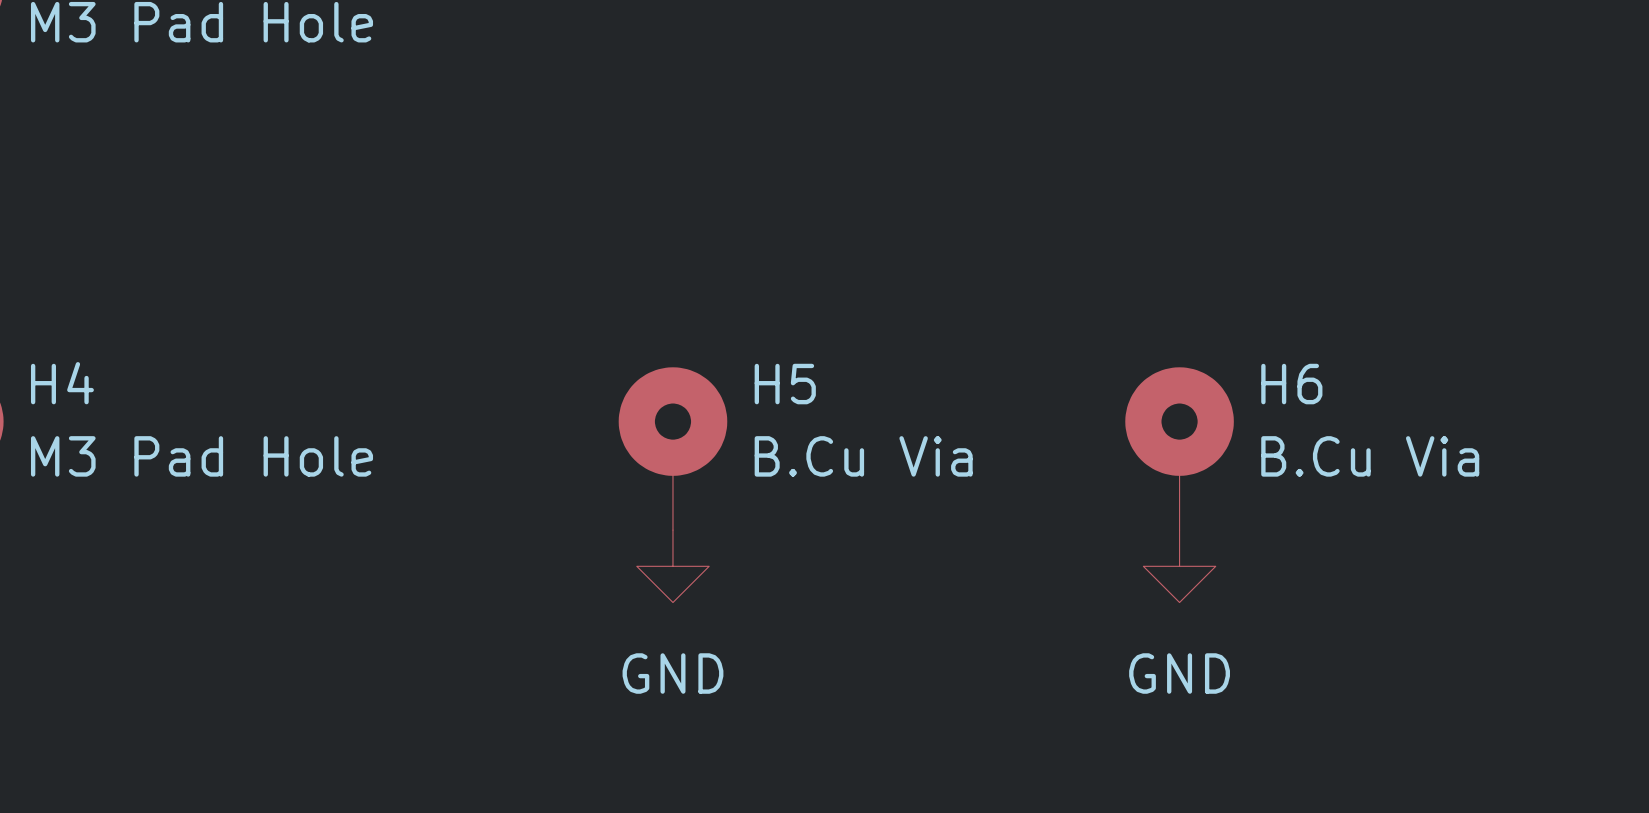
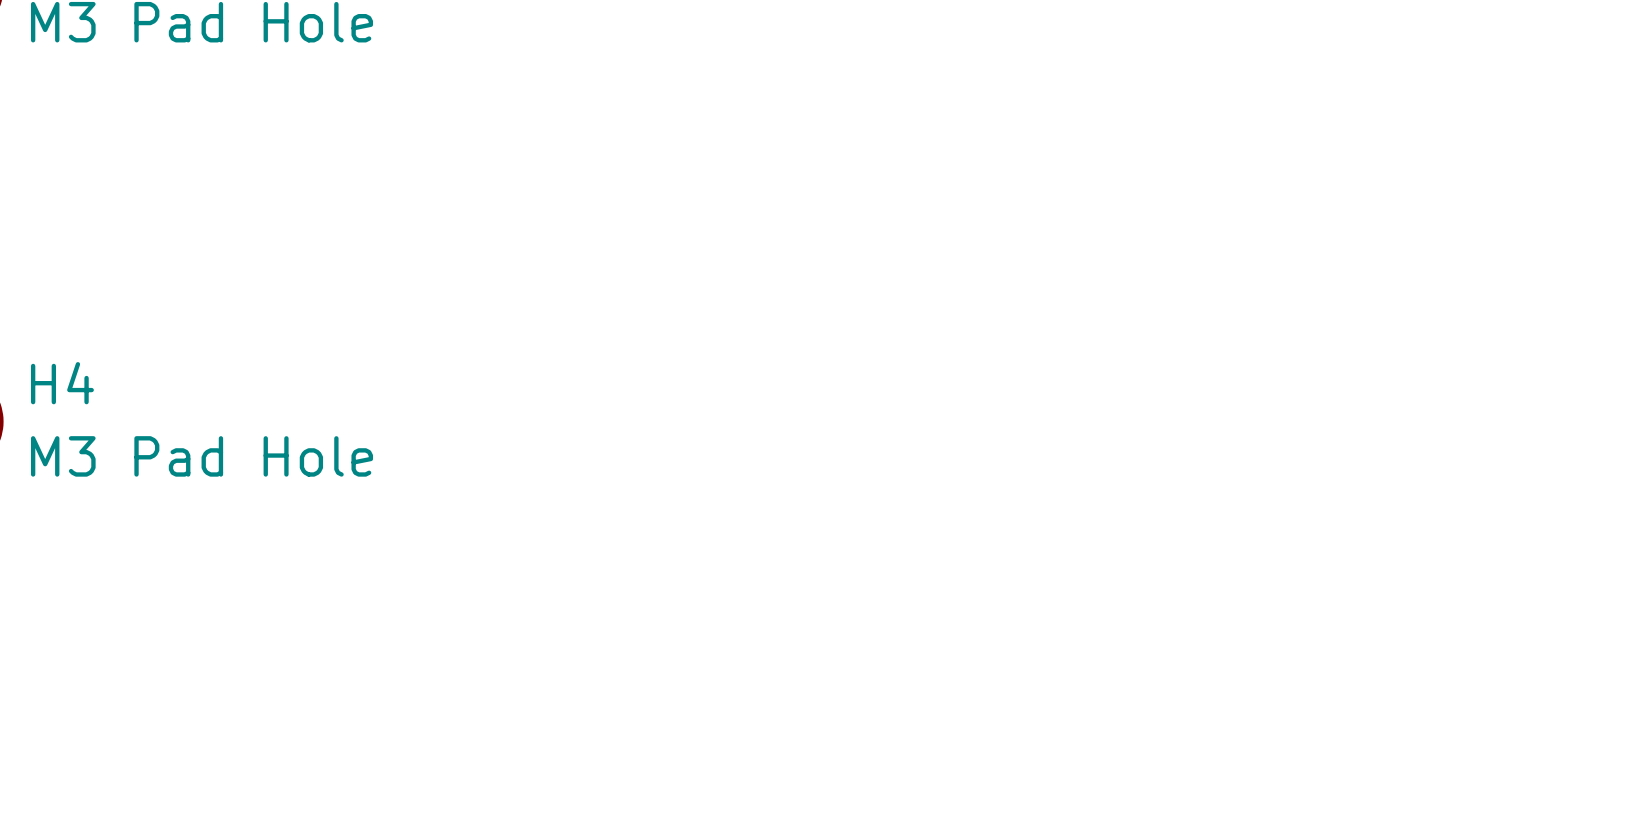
H5: B.Cu Via (672, 448) -> none
H6: B.Cu Via (1179, 448) -> none
power symbol: GND (672, 566) -> none
power symbol: GND (1179, 566) -> none

